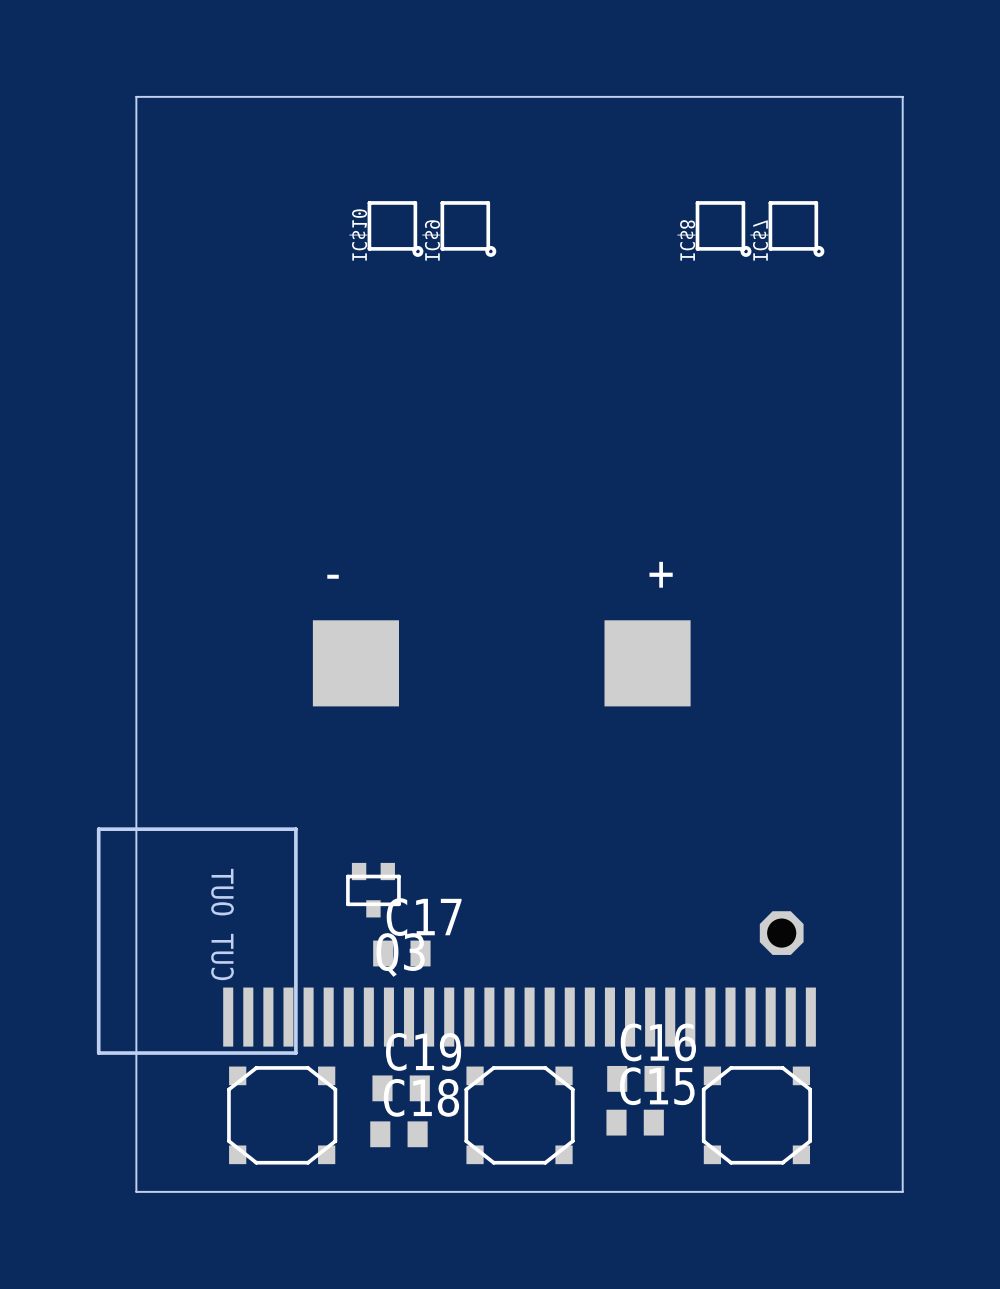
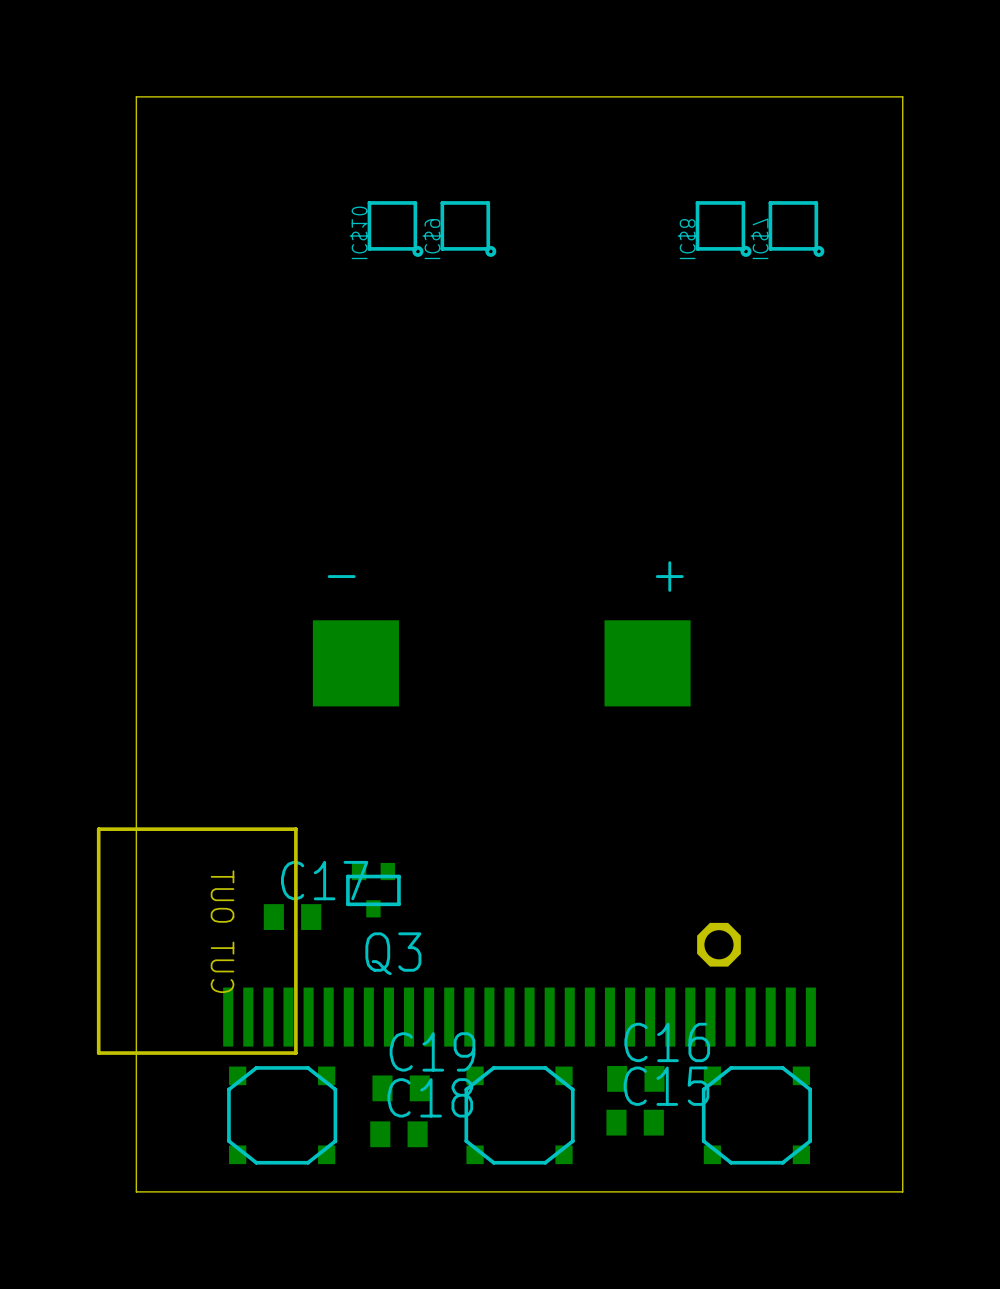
part position: (781, 933) -> (718, 944)
C17 position: (401, 953) -> (292, 917)

